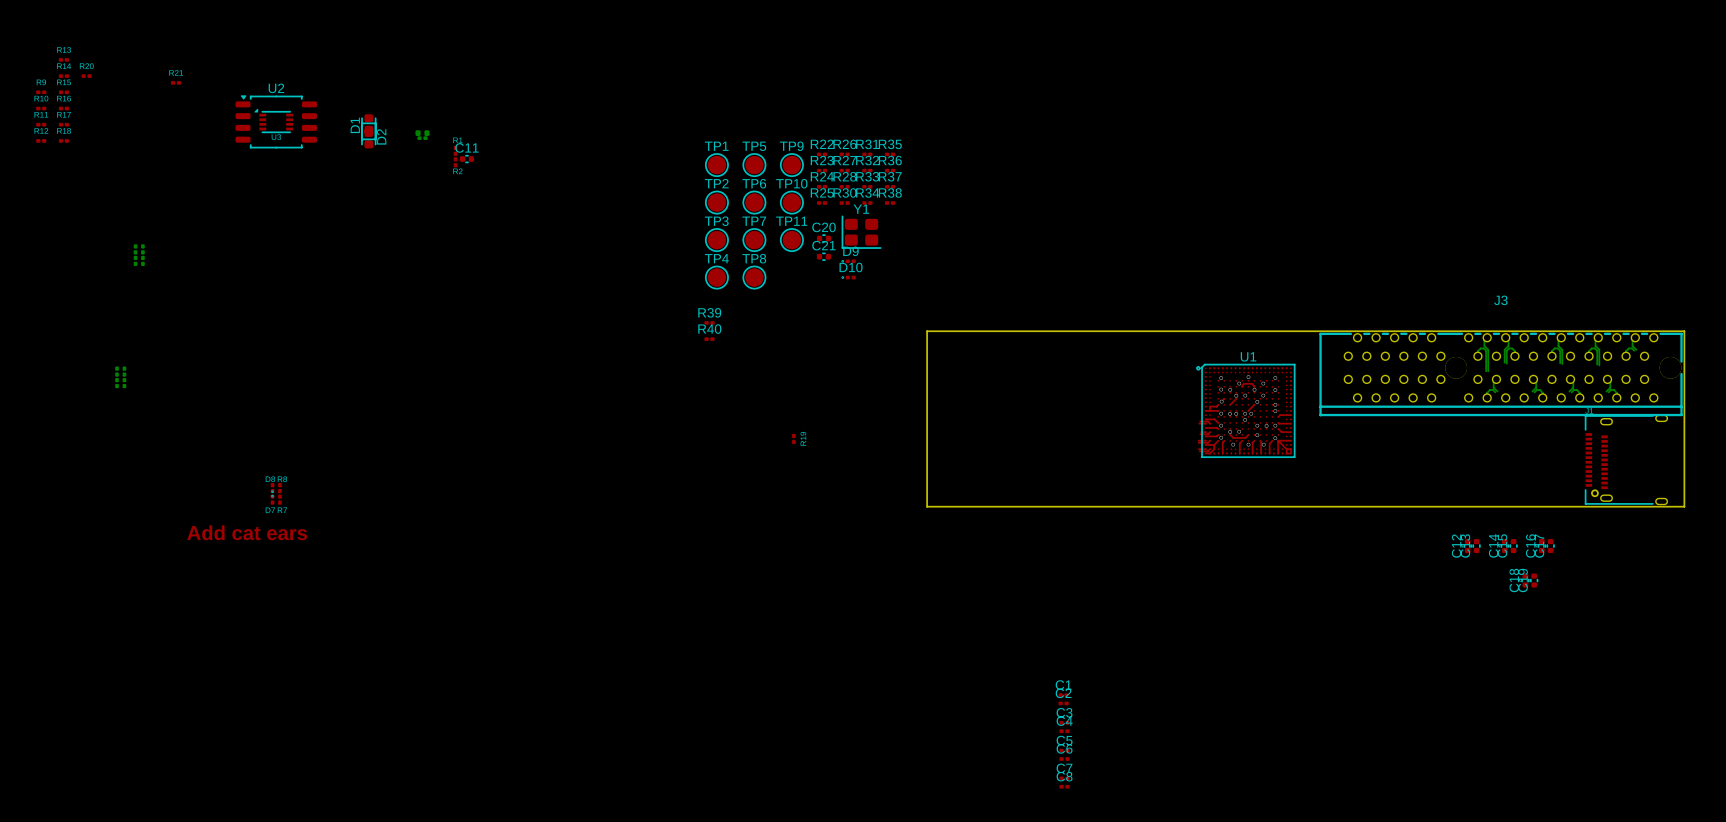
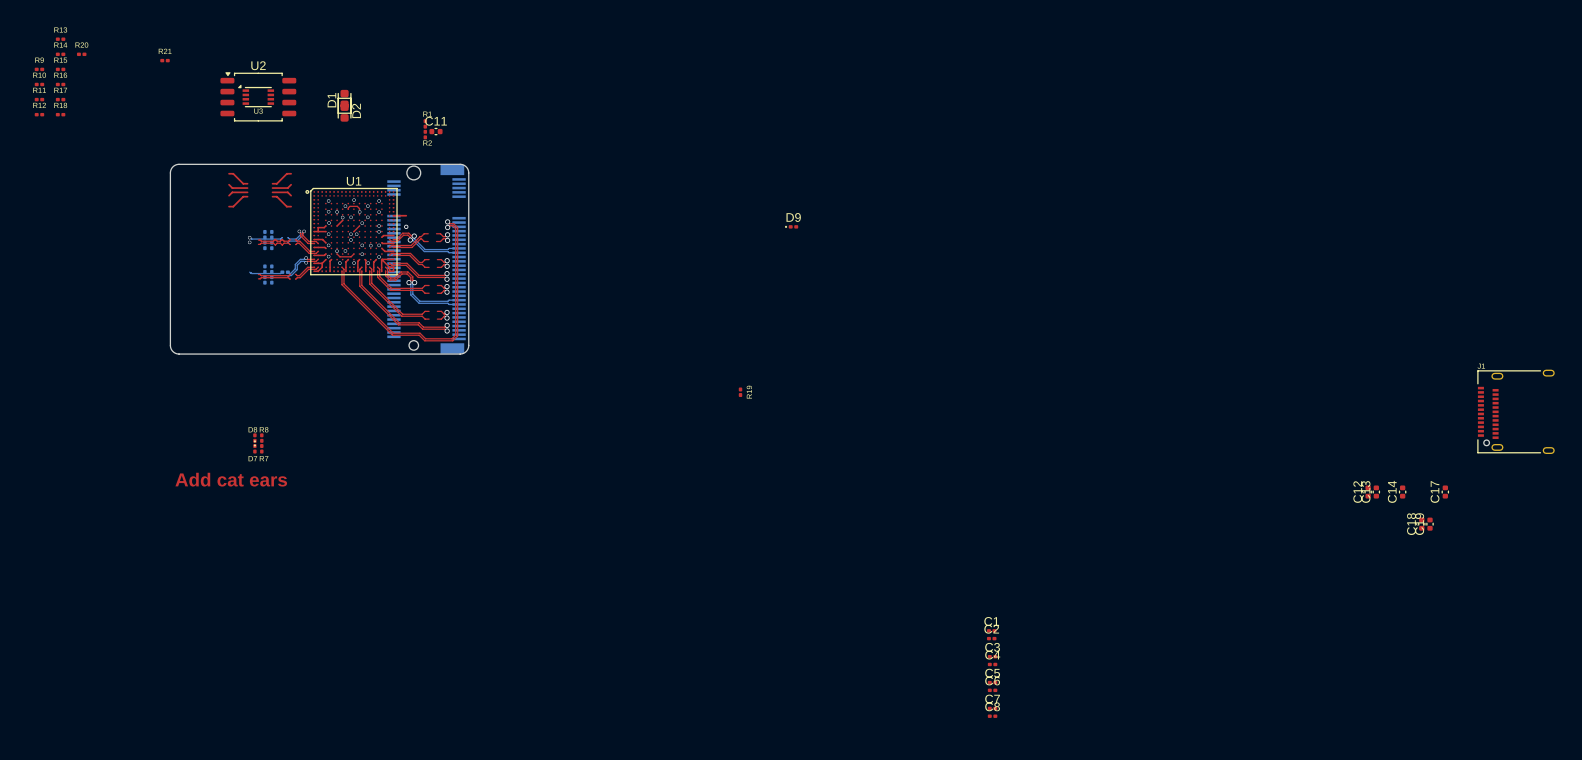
part: (422, 133) -> none
part: (422, 138) -> none
R22: (822, 154) -> none
R26: (844, 154) -> none
R31: (867, 154) -> none
R35: (890, 154) -> none
TP1: (716, 165) -> none
TP5: (754, 165) -> none
TP9: (791, 165) -> none
R23: (822, 170) -> none
R27: (844, 170) -> none
R32: (867, 170) -> none
R36: (890, 170) -> none
R24: (822, 186) -> none
R28: (844, 186) -> none
R33: (867, 186) -> none
R37: (890, 186) -> none
board edge: none -> (179, 164) (464, 165) (468, 172) (467, 349) (460, 354) (174, 352) (170, 345) (170, 172) (172, 166) (179, 164)
TP2: (716, 202) -> none
TP6: (754, 202) -> none
TP10: (791, 202) -> none
R25: (822, 203) -> none
R30: (844, 203) -> none
R34: (867, 203) -> none
R38: (890, 203) -> none
top track: none -> (229, 173) (233, 173) (243, 183) (247, 183)
top track: none -> (291, 173) (286, 173) (276, 183) (272, 183)
top track: none -> (229, 184) (232, 188) (247, 188)
top track: none -> (291, 184) (287, 188) (272, 188)
top track: none -> (247, 192) (232, 192) (229, 195)
top track: none -> (272, 192) (287, 192) (291, 195)
top track: none -> (247, 196) (243, 196) (233, 206) (229, 206)
top track: none -> (272, 196) (276, 196) (286, 206) (291, 206)
via: none -> (354, 200)
Y1: (861, 232) -> none
via: none -> (328, 200)
via: none -> (379, 200)
C20: (823, 238) -> none
via: none -> (345, 206)
via: none -> (367, 206)
TP3: (716, 240) -> none
TP7: (754, 240) -> none
TP11: (791, 240) -> none
top track: none -> (348, 209) (349, 206) (357, 206) (359, 209)
via: none -> (328, 211)
via: none -> (337, 211)
via: none -> (359, 211)
via: none -> (379, 212)
part: (135, 249) -> none
part: (142, 249) -> none
top track: none -> (393, 215) (406, 215)
via: none -> (342, 217)
via: none -> (351, 217)
via: none -> (367, 217)
top track: none -> (342, 220) (337, 225)
top track: none -> (447, 221) (457, 227) (457, 335) (452, 340) (424, 340) (419, 335) (392, 335) (342, 284) (342, 271)
via: none -> (447, 221)
C21: (823, 256) -> none
via: none -> (329, 222)
via: none -> (362, 223)
part: (135, 260) -> none
part: (142, 260) -> none
top track: none -> (325, 225) (318, 227) (318, 231)
top track: none -> (359, 225) (353, 231)
via: none -> (379, 225)
via: none -> (406, 226)
top track: none -> (447, 227) (452, 225) (455, 228) (455, 335) (451, 338) (425, 338) (420, 333) (393, 333) (343, 283) (343, 269) (342, 267)
via: none -> (447, 227)
top track: none -> (299, 231) (300, 236) (308, 243) (314, 243)
bottom track: none -> (299, 231) (300, 234) (296, 239) (287, 237)
via: none -> (299, 231)
top track: none -> (304, 231) (302, 235) (308, 241) (316, 241) (318, 243)
bottom track: none -> (304, 231) (297, 241) (287, 242)
via: none -> (304, 231)
top track: none -> (314, 231) (325, 231)
via: none -> (379, 231)
top track: none -> (428, 233) (424, 233) (411, 245) (391, 245) (389, 247)
top track: none -> (436, 233) (440, 233) (443, 236) (447, 234)
part: none -> (264, 234)
part: none -> (271, 234)
via: none -> (328, 234)
via: none -> (350, 234)
via: none -> (356, 234)
via: none -> (447, 234)
top track: none -> (393, 235) (381, 237)
top track: none -> (414, 236) (402, 233) (396, 239) (393, 239)
bottom track: none -> (414, 236) (414, 238) (425, 249) (459, 248)
via: none -> (414, 236)
bottom track: none -> (249, 237) (282, 237)
via: none -> (249, 237)
top track: none -> (314, 239) (322, 239) (325, 242)
top track: none -> (389, 239) (397, 241) (403, 235) (407, 235) (410, 240)
top track: none -> (290, 239) (258, 240)
top track: none -> (295, 239) (299, 241) (310, 251) (314, 251)
via: none -> (350, 239)
bottom track: none -> (410, 240) (412, 240) (424, 251) (459, 252)
via: none -> (410, 240)
top track: none -> (447, 240) (443, 238) (440, 241) (436, 241)
via: none -> (447, 240)
top track: none -> (428, 241) (420, 238) (412, 247) (393, 247)
TP4: (716, 277) -> none
TP8: (754, 277) -> none
D10: (848, 277) -> none
via: none -> (249, 242)
top track: none -> (381, 242) (393, 243)
top track: none -> (258, 244) (290, 244)
top track: none -> (295, 244) (299, 243) (309, 253) (316, 253) (318, 251)
part: none -> (264, 245)
part: none -> (271, 245)
via: none -> (328, 245)
via: none -> (362, 245)
via: none -> (370, 245)
via: none -> (379, 245)
top track: none -> (314, 247) (325, 248)
top track: none -> (381, 248) (384, 251) (393, 251)
via: none -> (337, 251)
via: none -> (345, 251)
top track: none -> (325, 254) (314, 255)
top track: none -> (337, 254) (339, 256) (351, 256) (353, 254)
via: none -> (362, 254)
top track: none -> (389, 255) (391, 253) (410, 253) (419, 262) (429, 259)
top track: none -> (393, 255) (409, 255) (418, 264) (429, 267)
via: none -> (328, 256)
via: none -> (379, 257)
top track: none -> (306, 257) (314, 259)
bottom track: none -> (306, 257) (300, 259) (290, 273) (287, 272)
via: none -> (306, 257)
top track: none -> (318, 259) (306, 262)
top track: none -> (325, 259) (322, 263)
top track: none -> (331, 259) (330, 271)
top track: none -> (348, 259) (345, 261) (345, 271)
top track: none -> (359, 259) (357, 271)
top track: none -> (365, 259) (365, 271)
top track: none -> (376, 259) (373, 262) (373, 271)
top track: none -> (381, 259) (389, 267)
top track: none -> (393, 259) (382, 259) (381, 271)
part: none -> (426, 259)
top track: none -> (437, 259) (441, 259) (444, 262) (447, 260)
via: none -> (447, 260)
bottom track: none -> (306, 262) (301, 261) (297, 265) (297, 269) (287, 276)
via: none -> (306, 262)
top track: none -> (314, 263) (322, 263)
top track: none -> (322, 263) (322, 267) (318, 271) (314, 271)
via: none -> (339, 263)
via: none -> (354, 263)
via: none -> (368, 263)
top track: none -> (389, 263) (391, 265) (406, 265) (418, 277) (444, 277) (447, 279)
top track: none -> (393, 263) (407, 263) (419, 275) (444, 275) (447, 273)
top track: none -> (447, 266) (444, 264) (441, 267) (437, 267)
via: none -> (447, 266)
top track: none -> (314, 267) (307, 267) (299, 275) (295, 274)
top track: none -> (318, 267) (316, 269) (308, 269) (300, 277) (295, 279)
top track: none -> (361, 267) (359, 269) (359, 286) (398, 324) (418, 324) (422, 329) (444, 329) (447, 330)
top track: none -> (369, 267) (371, 269) (371, 283) (402, 314) (422, 314) (425, 311) (429, 311)
top track: none -> (377, 267) (379, 269) (379, 276) (391, 288) (422, 288) (425, 285) (429, 285)
top track: none -> (385, 267) (390, 278) (395, 278) (401, 272) (407, 272) (412, 276) (414, 282)
top track: none -> (389, 267) (393, 267) (393, 271) (389, 271) (389, 267)
part: none -> (264, 269)
part: none -> (271, 269)
top track: none -> (361, 271) (361, 285) (399, 322) (419, 322) (423, 327) (444, 327) (447, 325)
top track: none -> (369, 271) (369, 284) (401, 316) (422, 316) (425, 319) (429, 319)
top track: none -> (377, 271) (377, 277) (390, 290) (422, 290) (425, 293) (429, 293)
top track: none -> (385, 271) (385, 275) (389, 280) (395, 280) (401, 273) (407, 273) (410, 277) (409, 282)
bottom track: none -> (249, 272) (282, 272)
part: none -> (285, 272)
via: none -> (447, 273)
top track: none -> (290, 274) (258, 274)
top track: none -> (258, 278) (290, 279)
via: none -> (447, 279)
part: none -> (264, 279)
part: none -> (271, 279)
bottom track: none -> (409, 282) (410, 284) (410, 294) (419, 303) (459, 304)
via: none -> (409, 282)
bottom track: none -> (414, 282) (412, 284) (412, 294) (420, 301) (459, 300)
via: none -> (414, 282)
R39: (709, 322) -> none
top track: none -> (437, 285) (441, 285) (444, 288) (447, 286)
via: none -> (447, 286)
top track: none -> (447, 292) (444, 290) (441, 293) (437, 293)
via: none -> (447, 292)
board edge: (927, 331) (1684, 331) (1684, 506) (927, 506) (927, 331) -> none
bottom track: (1487, 337) (1484, 340) (1484, 346) (1488, 349) (1488, 371) -> none
bottom track: (1505, 337) (1508, 340) (1508, 346) (1504, 349) (1504, 362) -> none
bottom track: (1561, 337) (1558, 340) (1558, 346) (1562, 349) (1562, 364) -> none
bottom track: (1598, 337) (1595, 340) (1595, 346) (1599, 349) (1599, 365) -> none
bottom track: (1635, 337) (1632, 340) (1632, 346) (1636, 349) -> none
R40: (709, 339) -> none
bottom track: (1634, 350) (1628, 348) (1626, 351) (1626, 356) -> none
top track: none -> (437, 311) (441, 311) (444, 314) (447, 312)
via: none -> (447, 312)
bottom track: (1477, 356) (1477, 351) (1480, 348) (1486, 350) (1486, 371) -> none
bottom track: (1514, 356) (1514, 351) (1509, 348) (1506, 350) (1506, 363) -> none
bottom track: (1551, 356) (1551, 351) (1557, 348) (1560, 350) (1560, 363) -> none
bottom track: (1589, 356) (1589, 351) (1594, 348) (1597, 350) (1597, 364) -> none
top track: none -> (447, 318) (444, 316) (441, 319) (437, 319)
via: none -> (447, 318)
via: none -> (447, 325)
part: (117, 371) -> none
part: (124, 371) -> none
via: none -> (447, 330)
J3: (1501, 374) -> none
via: (1248, 377) -> none
via: (1221, 378) -> none
via: (1275, 378) -> none
bottom track: (1496, 379) (1493, 382) (1493, 387) (1497, 391) -> none
bottom track: (1533, 379) (1536, 382) (1536, 387) (1532, 391) -> none
bottom track: (1570, 379) (1573, 382) (1573, 387) (1569, 391) -> none
bottom track: (1607, 379) (1610, 382) (1610, 387) (1606, 391) -> none
part: (117, 383) -> none
part: (124, 383) -> none
via: (1239, 383) -> none
via: (1263, 383) -> none
top track: (1242, 386) (1244, 383) (1251, 383) (1254, 386) -> none
via: (1221, 389) -> none
via: (1230, 389) -> none
via: (1254, 389) -> none
via: (1275, 390) -> none
bottom track: (1495, 392) (1489, 390) (1487, 392) (1487, 397) -> none
bottom track: (1534, 392) (1539, 390) (1542, 392) (1542, 397) -> none
bottom track: (1571, 392) (1576, 390) (1579, 392) (1579, 397) -> none
bottom track: (1608, 392) (1614, 390) (1616, 392) (1616, 397) -> none
via: (1236, 395) -> none
via: (1245, 395) -> none
via: (1263, 395) -> none
top track: (1224, 398) (1221, 401) -> none
top track: (1236, 398) (1230, 404) -> none
via: (1221, 401) -> none
via: (1257, 401) -> none
top track: (1218, 404) (1210, 406) (1210, 410) -> none
top track: (1254, 404) (1248, 410) -> none
via: (1275, 404) -> none
top track: (1205, 410) (1218, 410) -> none
U1 position: (1245, 410) -> (351, 231)
via: (1275, 411) -> none
via: (1221, 413) -> none
via: (1230, 413) -> none
via: (1236, 413) -> none
via: (1245, 413) -> none
via: (1251, 413) -> none
top track: (1290, 415) (1278, 416) -> none
top track: (1205, 419) (1214, 419) (1218, 422) -> none
via: (1245, 419) -> none
top track: (1200, 421) (1207, 421) (1210, 423) -> none
top track: (1278, 422) (1290, 423) -> none
top track: (1199, 423) (1205, 423) -> none
via: (1221, 425) -> none
via: (1257, 425) -> none
via: (1266, 425) -> none
via: (1275, 425) -> none
top track: (1205, 427) (1218, 428) -> none
top track: (1278, 428) (1281, 432) (1290, 432) -> none
via: (1230, 431) -> none
via: (1239, 431) -> none
top track: (1201, 432) (1205, 432) -> none
top track: (1210, 432) (1207, 434) (1200, 434) -> none
top track: (1218, 434) (1205, 436) -> none
top track: (1230, 434) (1233, 437) (1245, 437) (1248, 434) -> none
via: (1257, 435) -> none
via: (1221, 437) -> none
via: (1275, 438) -> none
top track: (1198, 440) (1205, 440) -> none
top track: (1210, 440) (1207, 442) (1198, 442) -> none
top track: (1218, 440) (1214, 444) -> none
top track: (1224, 440) (1222, 453) -> none
top track: (1242, 440) (1239, 443) (1239, 453) -> none
top track: (1254, 440) (1252, 453) -> none
top track: (1260, 440) (1261, 453) -> none
top track: (1272, 440) (1269, 443) (1269, 453) -> none
top track: (1278, 440) (1286, 449) -> none
top track: (1290, 440) (1278, 440) (1278, 453) -> none
top track: (1205, 444) (1214, 444) -> none
top track: (1214, 444) (1214, 449) (1210, 453) (1205, 453) -> none
via: (1233, 444) -> none
via: (1248, 444) -> none
via: (1263, 444) -> none
top track: (1198, 449) (1205, 449) -> none
top track: (1210, 449) (1207, 451) (1199, 451) -> none
top track: (1286, 449) (1290, 449) (1290, 453) (1286, 453) (1286, 449) -> none
C15: (1513, 546) -> none
C16: (1541, 546) -> none

